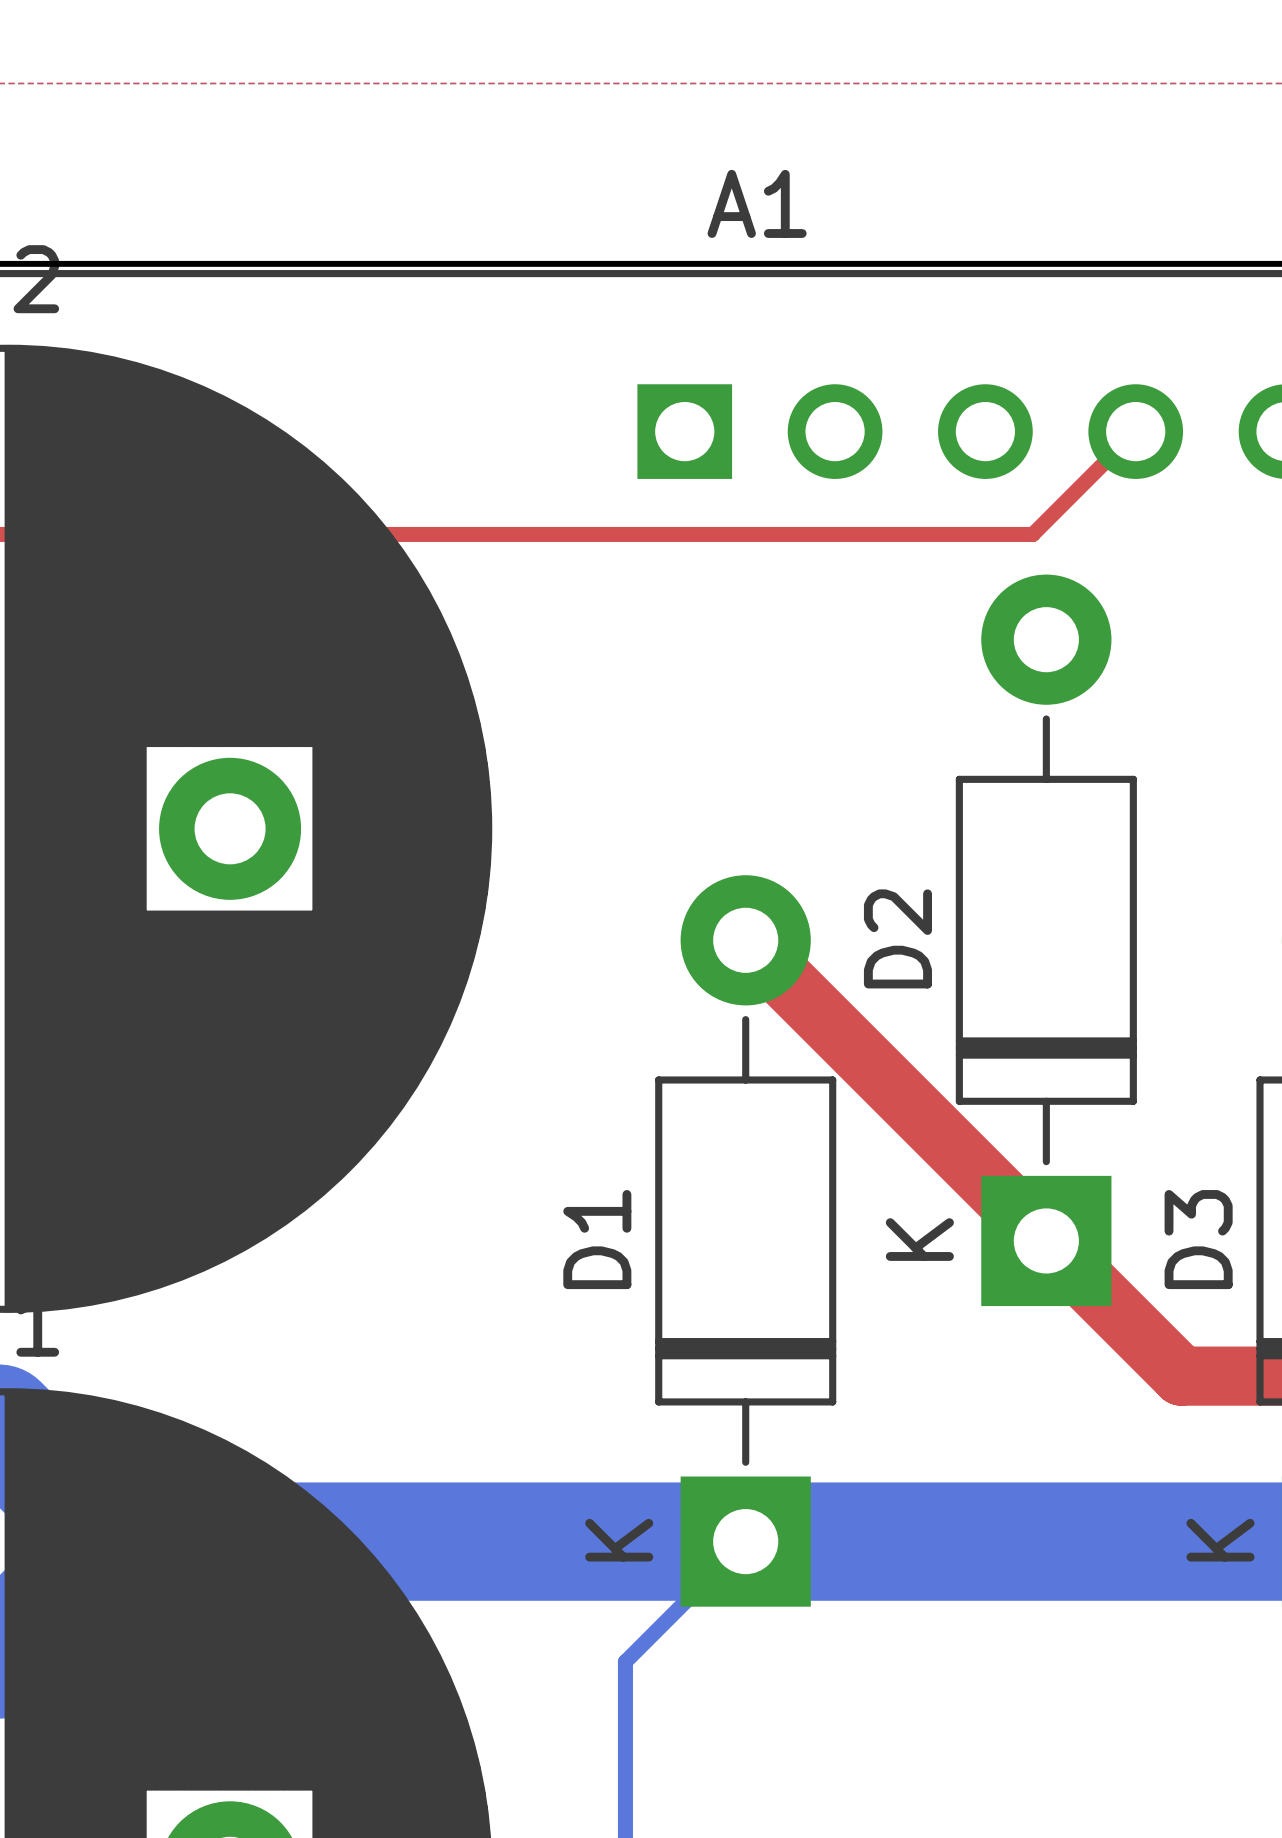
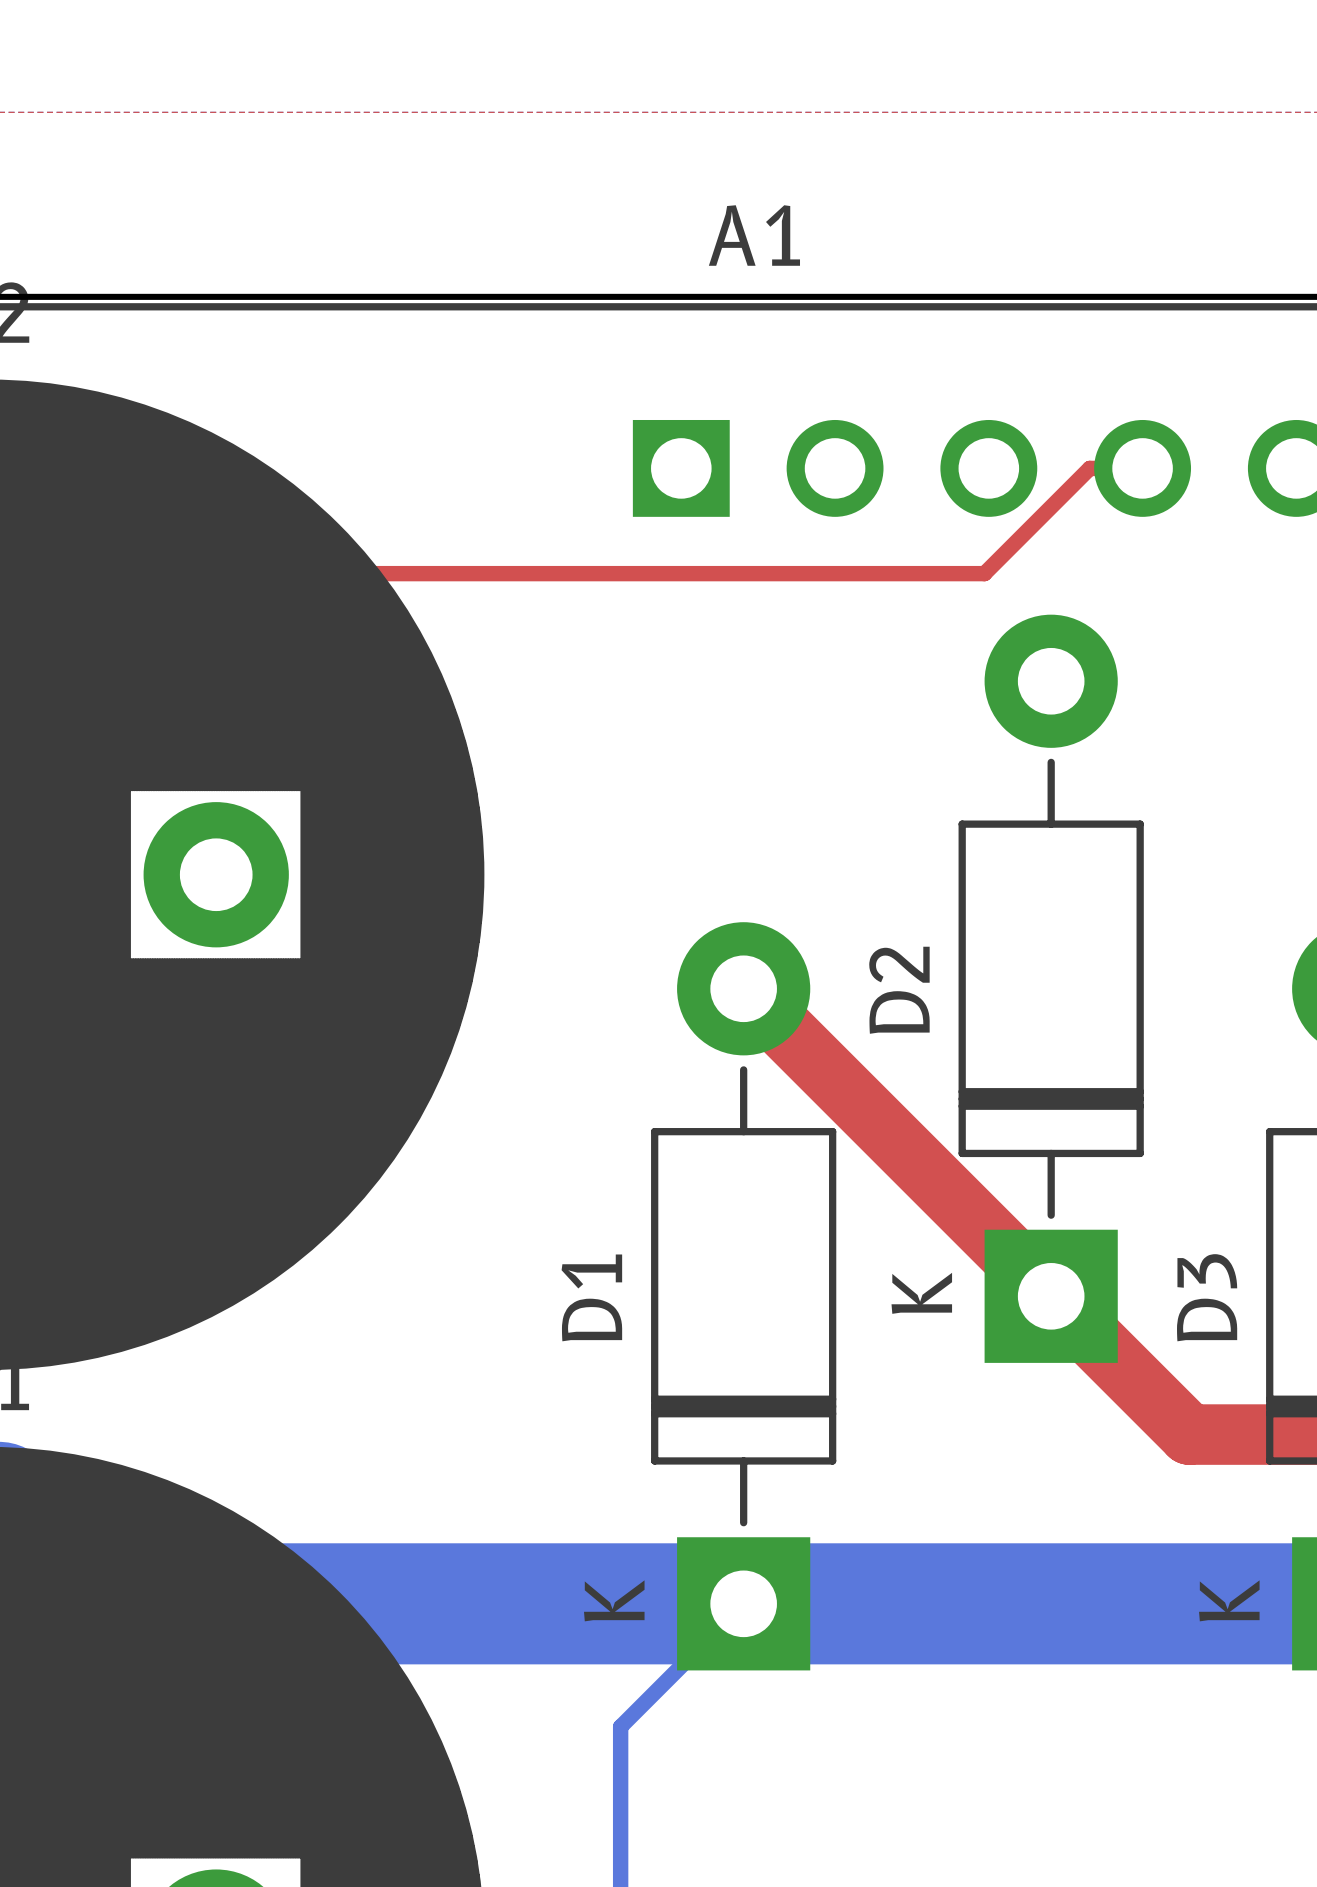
top track: (1135, 431) (1032, 534) (981, 534) -> (1142, 468) (1089, 468) (984, 573)

